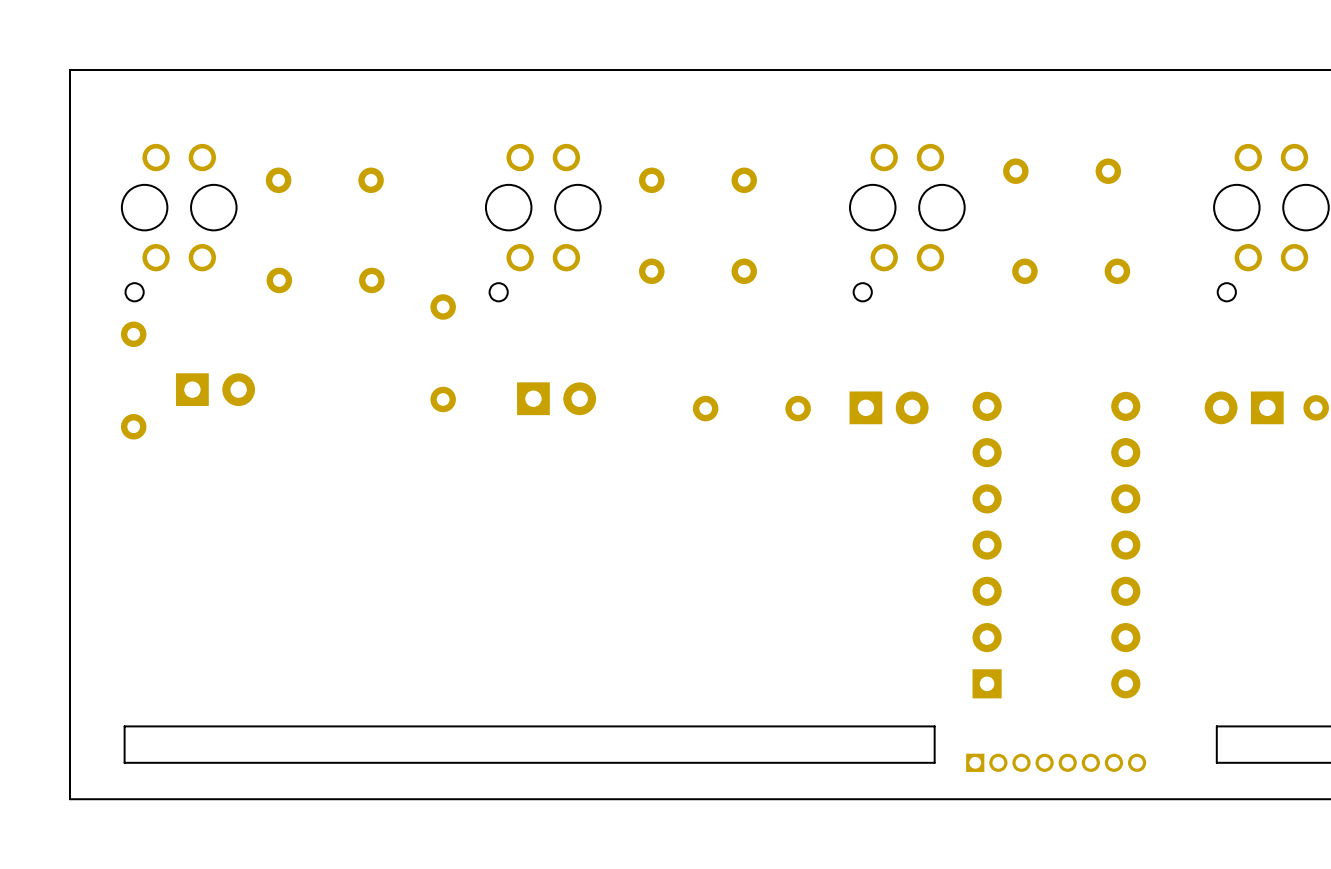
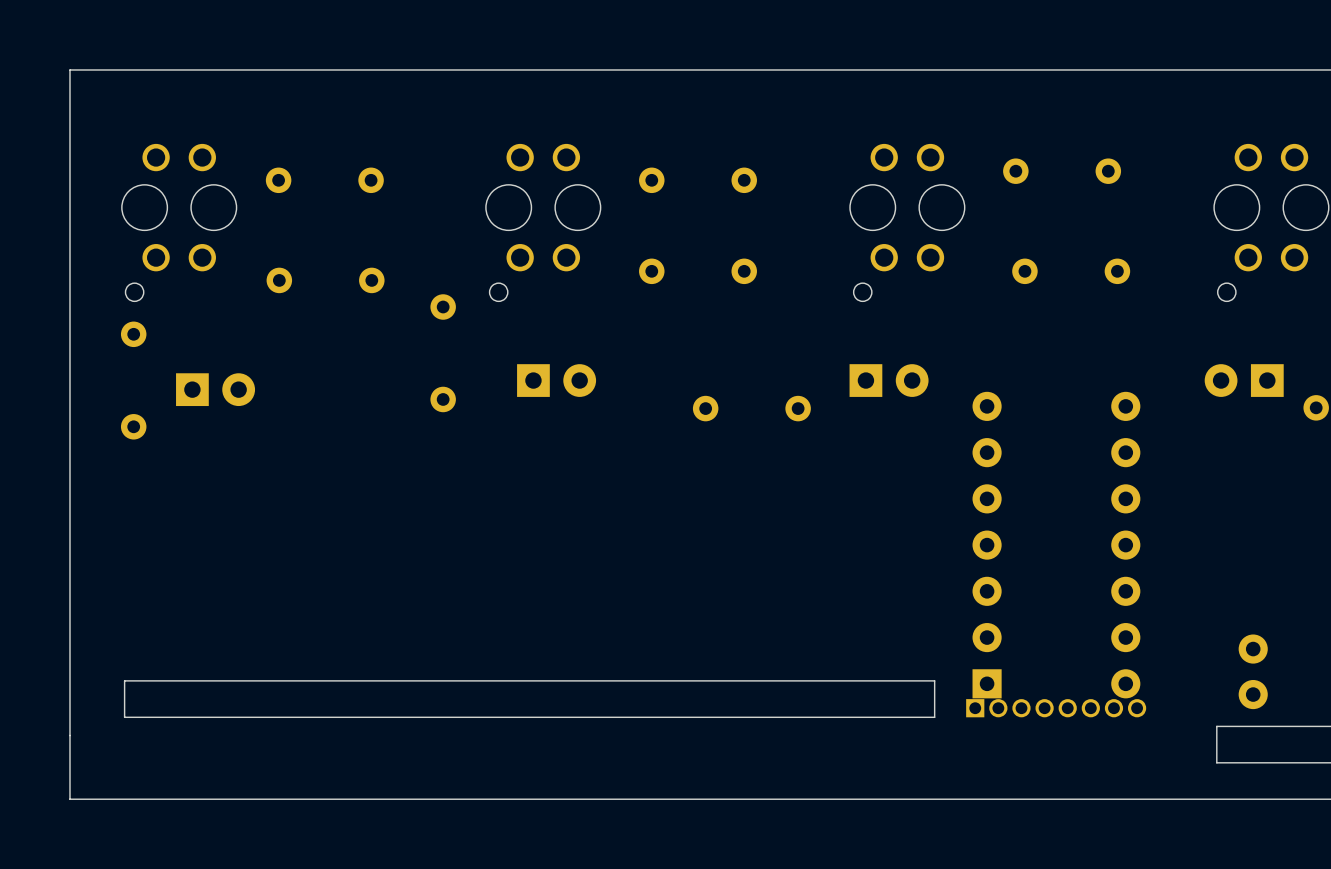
part position: (556, 398) -> (556, 380)
part position: (889, 407) -> (889, 380)
part position: (1244, 407) -> (1244, 380)
part: none -> (1253, 671)
board edge: (934, 726) (124, 726) (124, 762) (934, 762) (934, 726) -> (934, 680) (124, 680) (124, 717) (934, 717) (934, 680)
part position: (1056, 762) -> (1056, 708)

